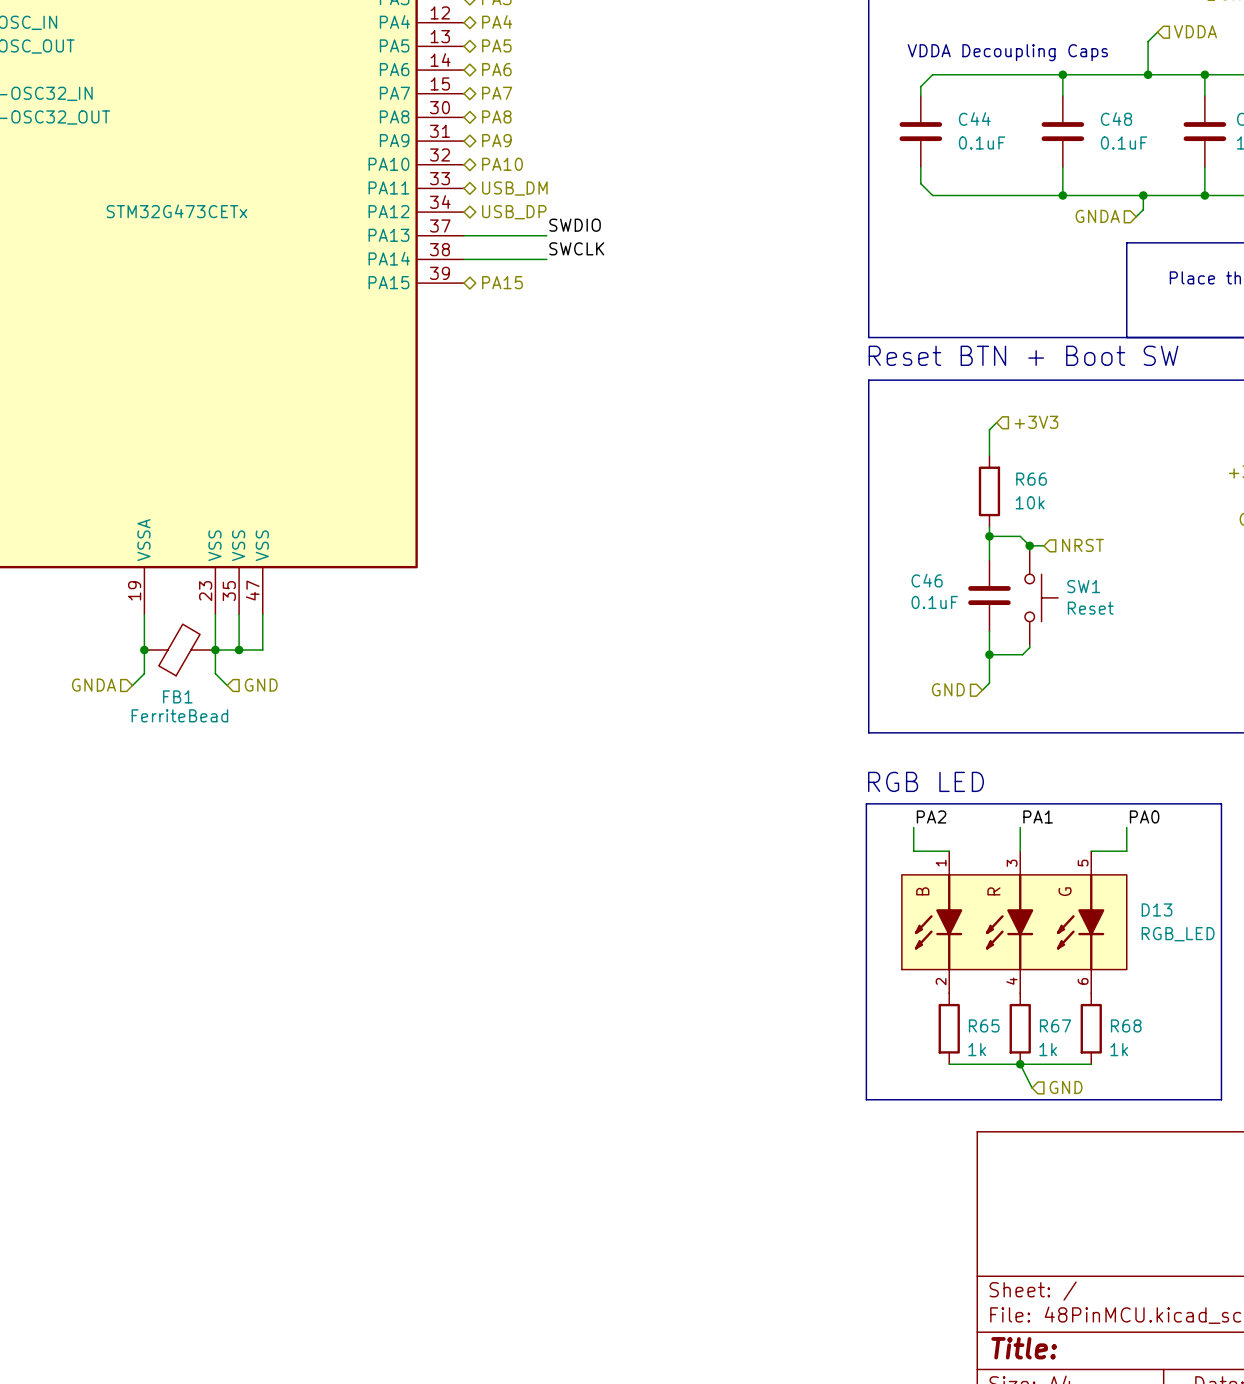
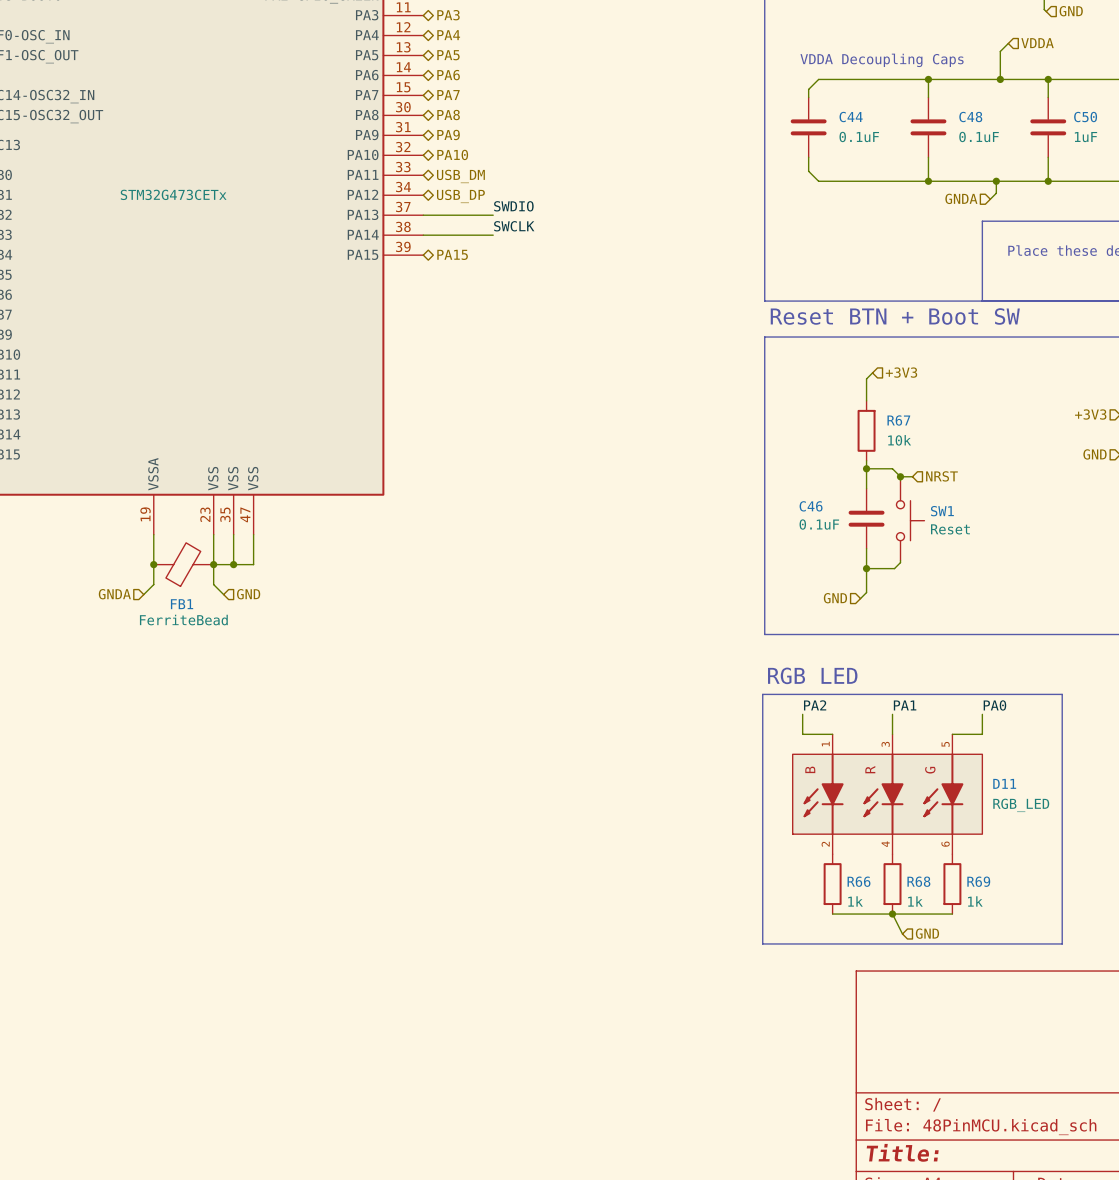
R66 name: R66 (1031, 479) -> R67 (898, 420)
D13 name: D13 (1157, 909) -> D11 (1004, 783)
R65 name: R65 (984, 1025) -> R66 (858, 881)
R67 name: R67 (1055, 1025) -> R68 (918, 881)
R68 name: R68 (1126, 1025) -> R69 (978, 881)

